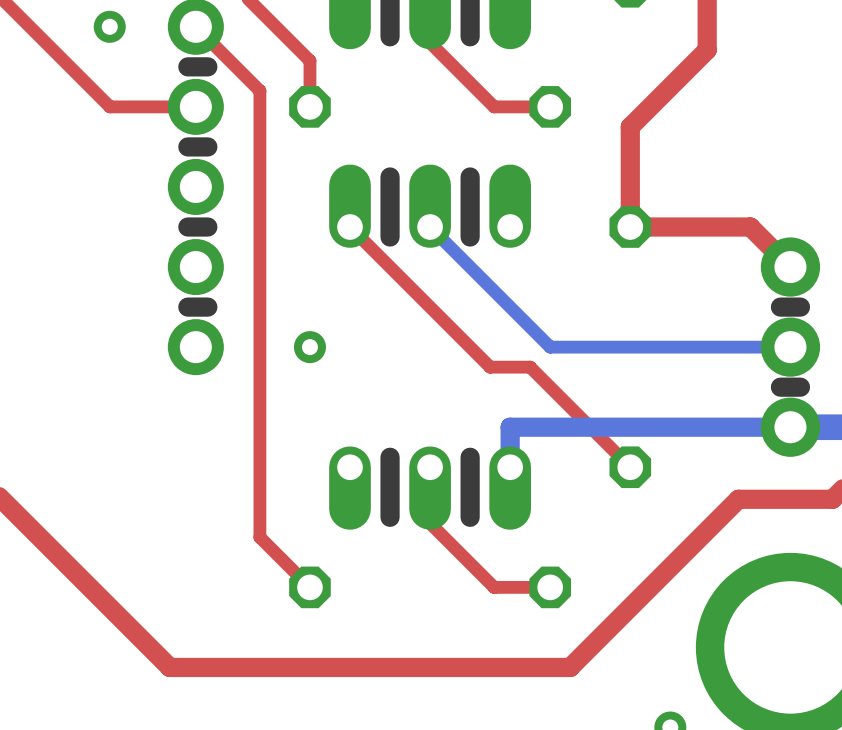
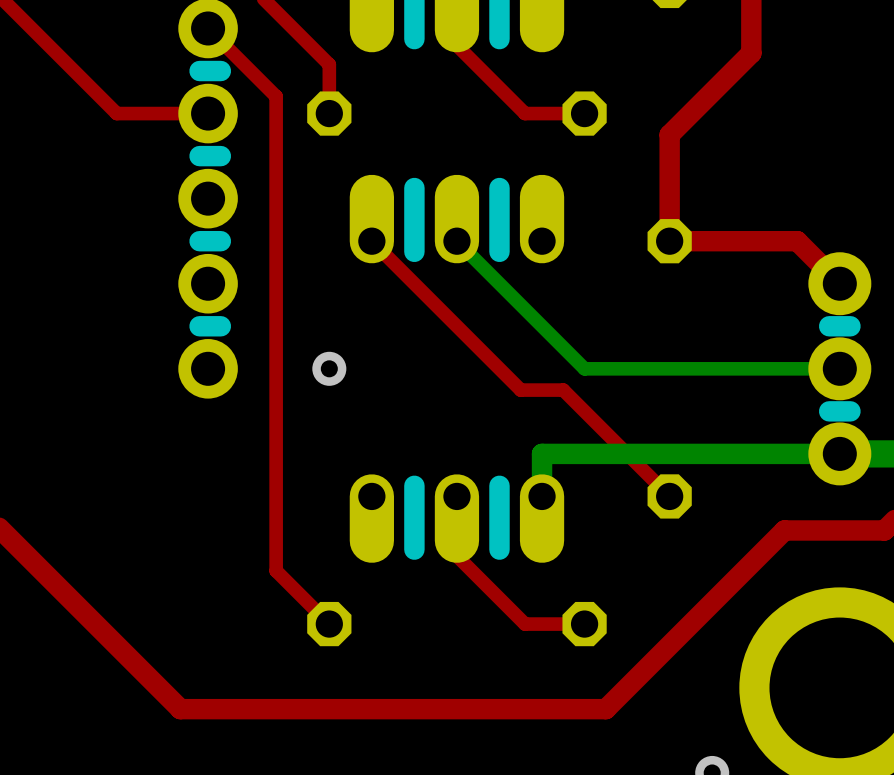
via: (109, 26) -> none

